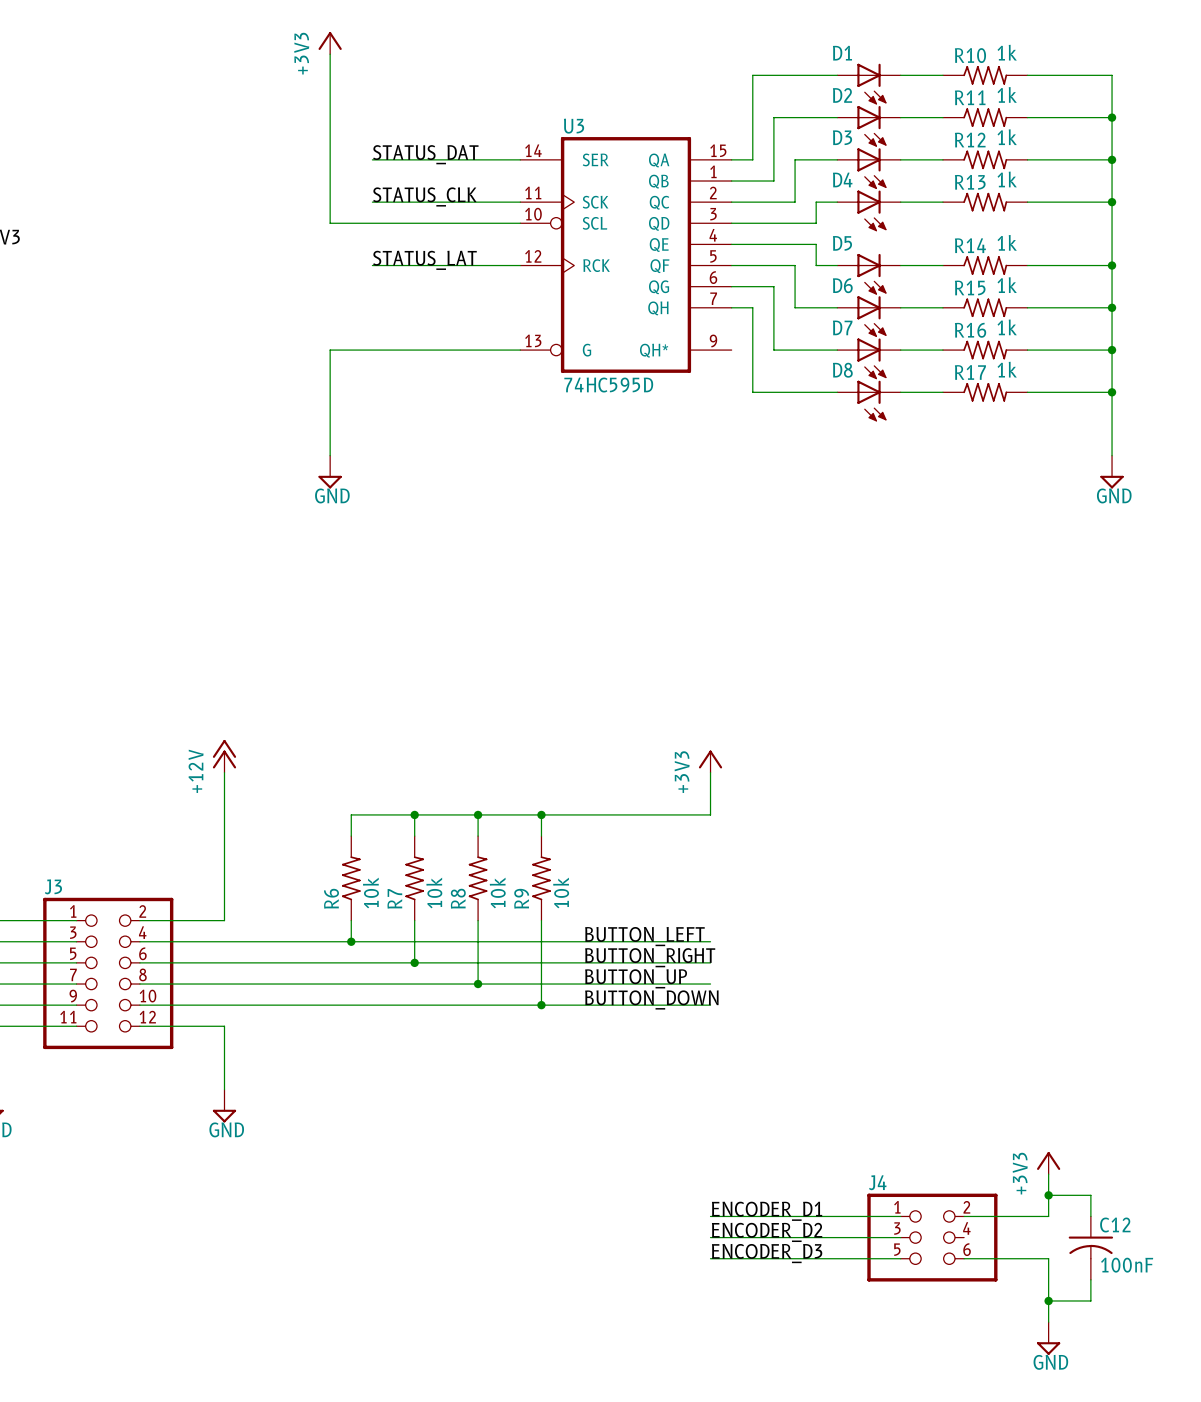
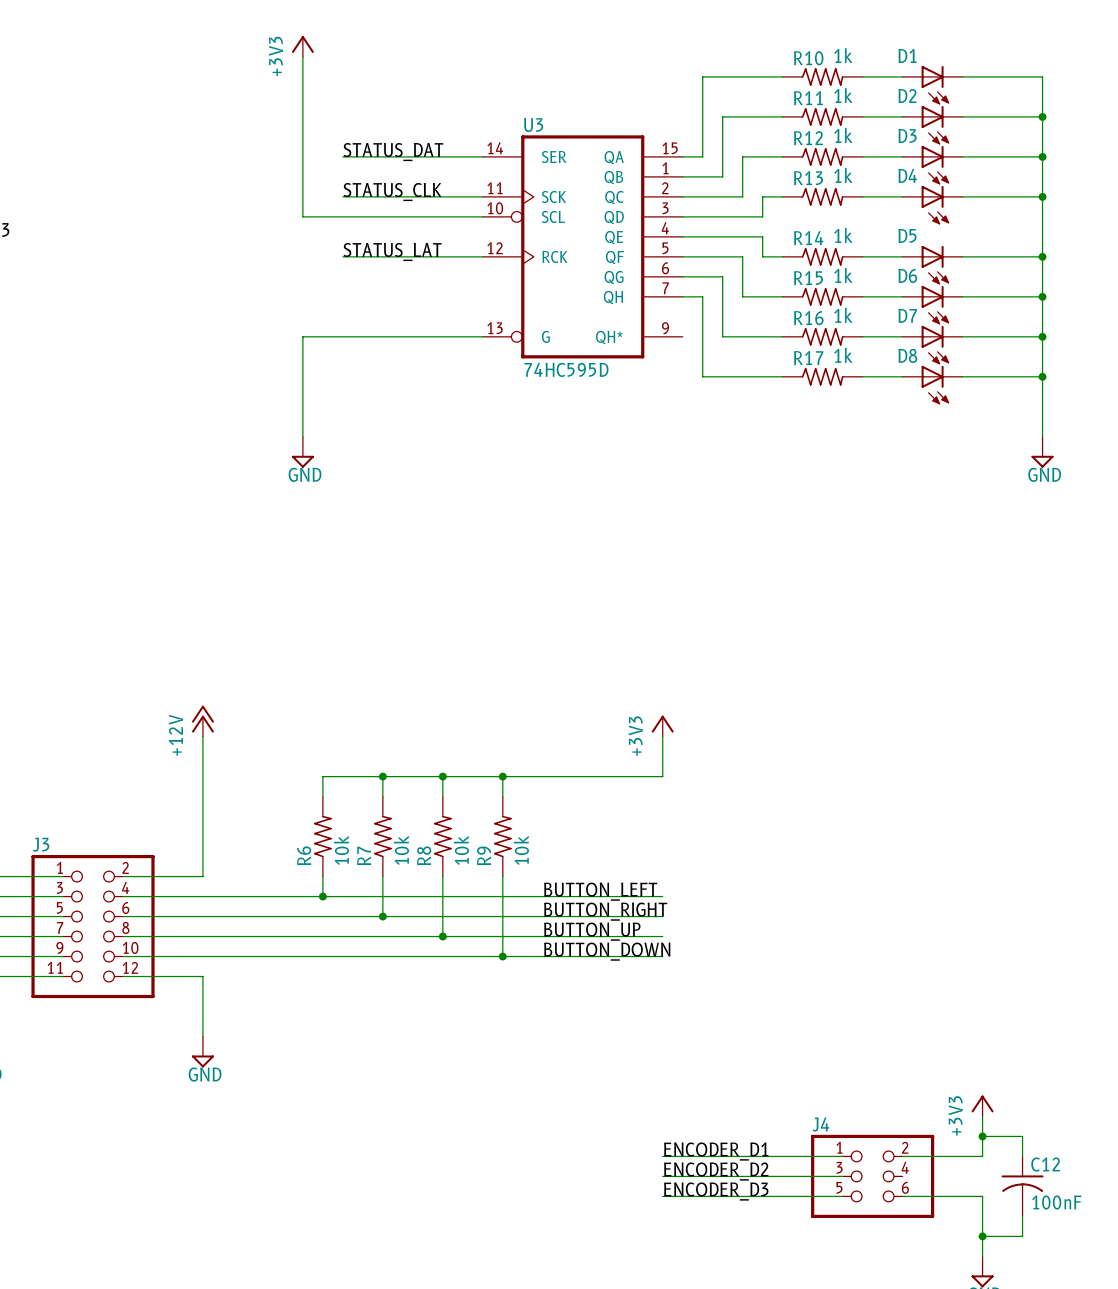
R10 position: (985, 75) -> (822, 76)
D1 position: (869, 84) -> (932, 85)
R11 position: (985, 117) -> (822, 116)
D2 position: (869, 126) -> (932, 125)
R12 position: (985, 159) -> (822, 156)
D3 position: (869, 168) -> (932, 165)
R13 position: (985, 202) -> (822, 196)
D4 position: (869, 210) -> (932, 205)
R14 position: (985, 265) -> (822, 256)
D5 position: (869, 274) -> (932, 265)
R15 position: (985, 307) -> (822, 296)
D6 position: (869, 316) -> (932, 305)
R16 position: (985, 350) -> (822, 336)
D7 position: (869, 358) -> (932, 345)
R17 position: (985, 392) -> (822, 376)
D8 position: (869, 401) -> (932, 385)

